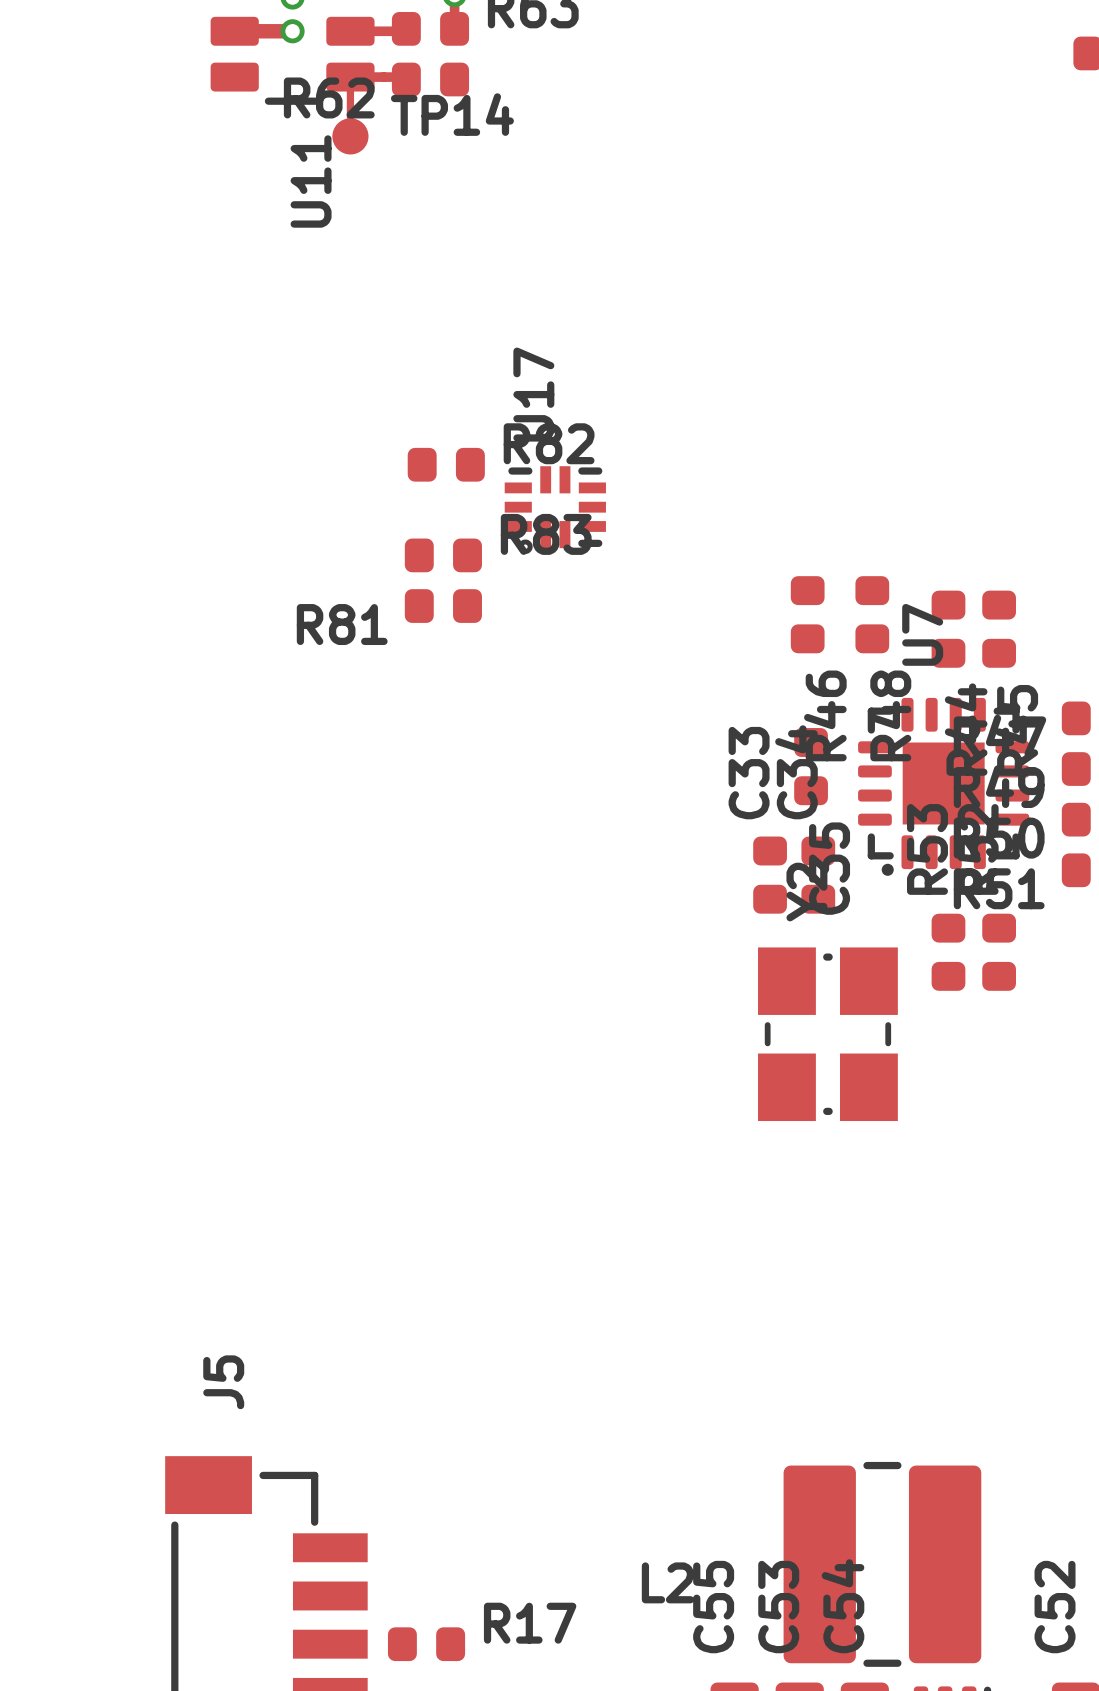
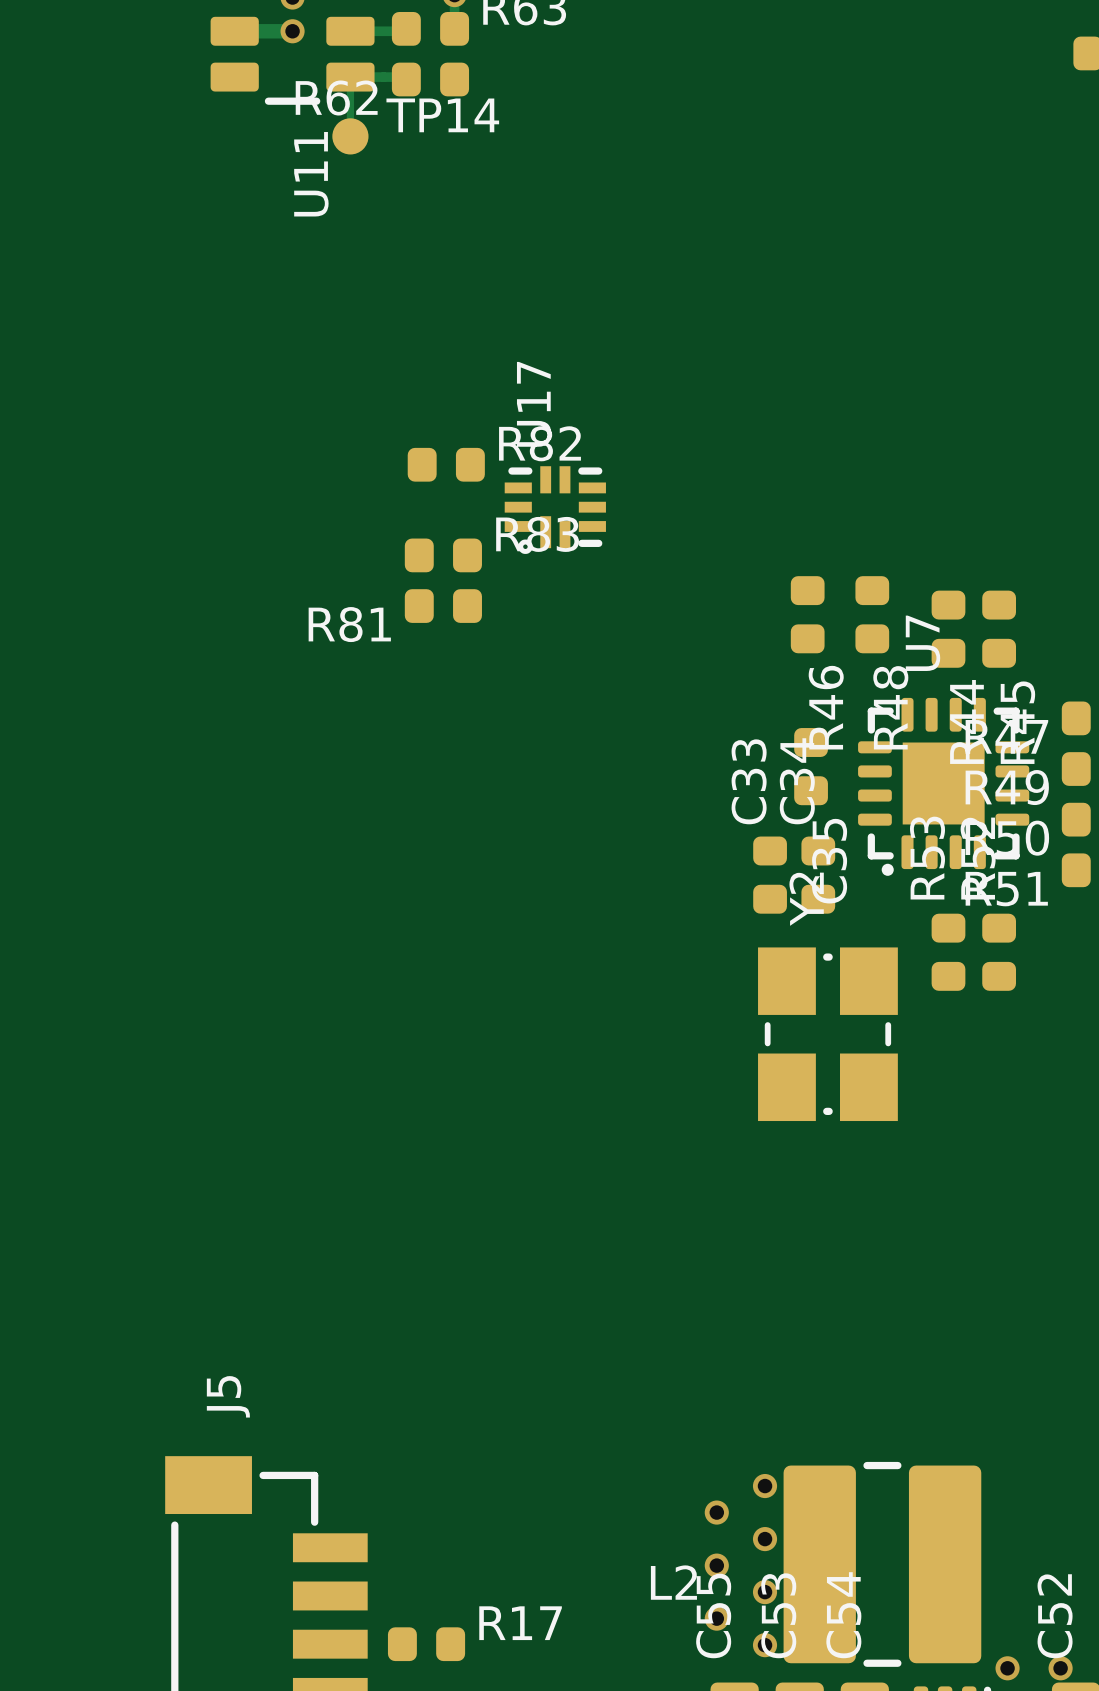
via: none -> (765, 1486)
via: none -> (716, 1512)
via: none -> (765, 1539)
via: none -> (716, 1565)
via: none -> (765, 1592)
via: none -> (716, 1618)
via: none -> (765, 1645)
via: none -> (1007, 1668)
via: none -> (1060, 1668)

